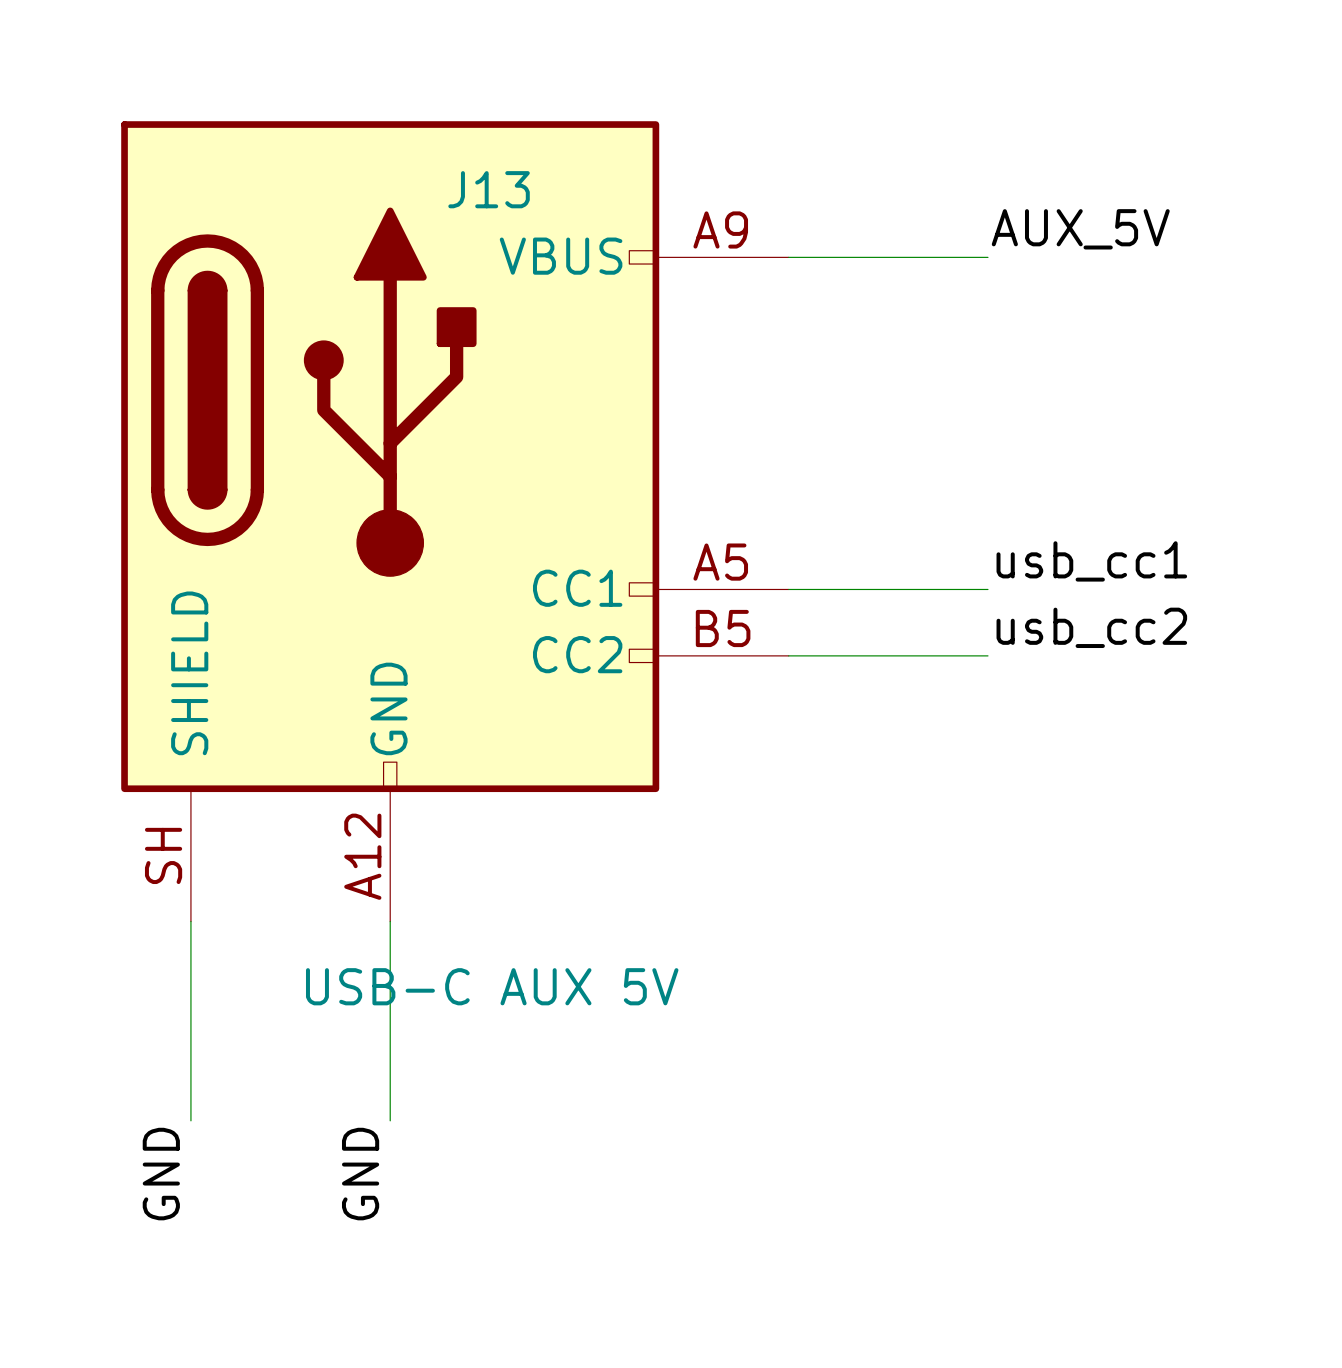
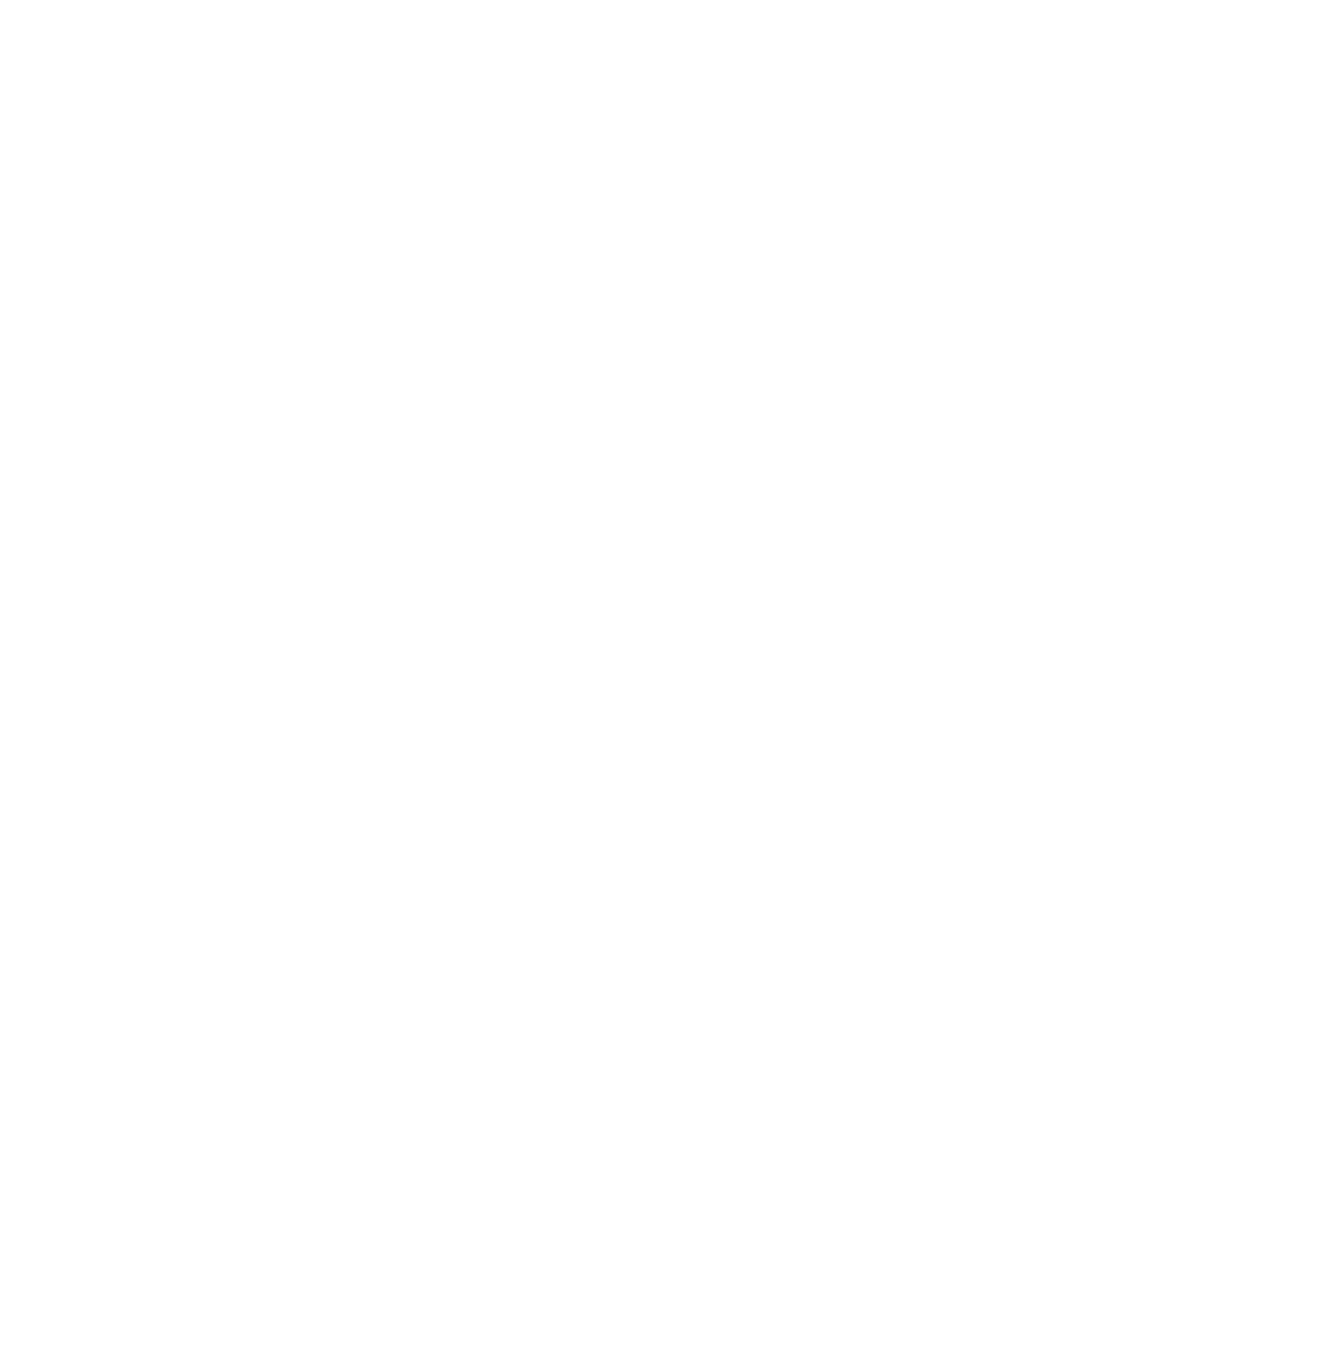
label: AUX_5V (1080, 229) -> none
wire: (788, 257) (987, 257) -> none
J13: USB-C AUX 5V (454, 521) -> none
label: usb_cc1 (1091, 561) -> none
wire: (788, 589) (987, 589) -> none
label: usb_cc2 (1091, 627) -> none
wire: (788, 655) (987, 655) -> none
wire: (190, 921) (190, 1120) -> none
wire: (390, 921) (390, 1120) -> none
label: GND (161, 1174) -> none
label: GND (360, 1174) -> none

